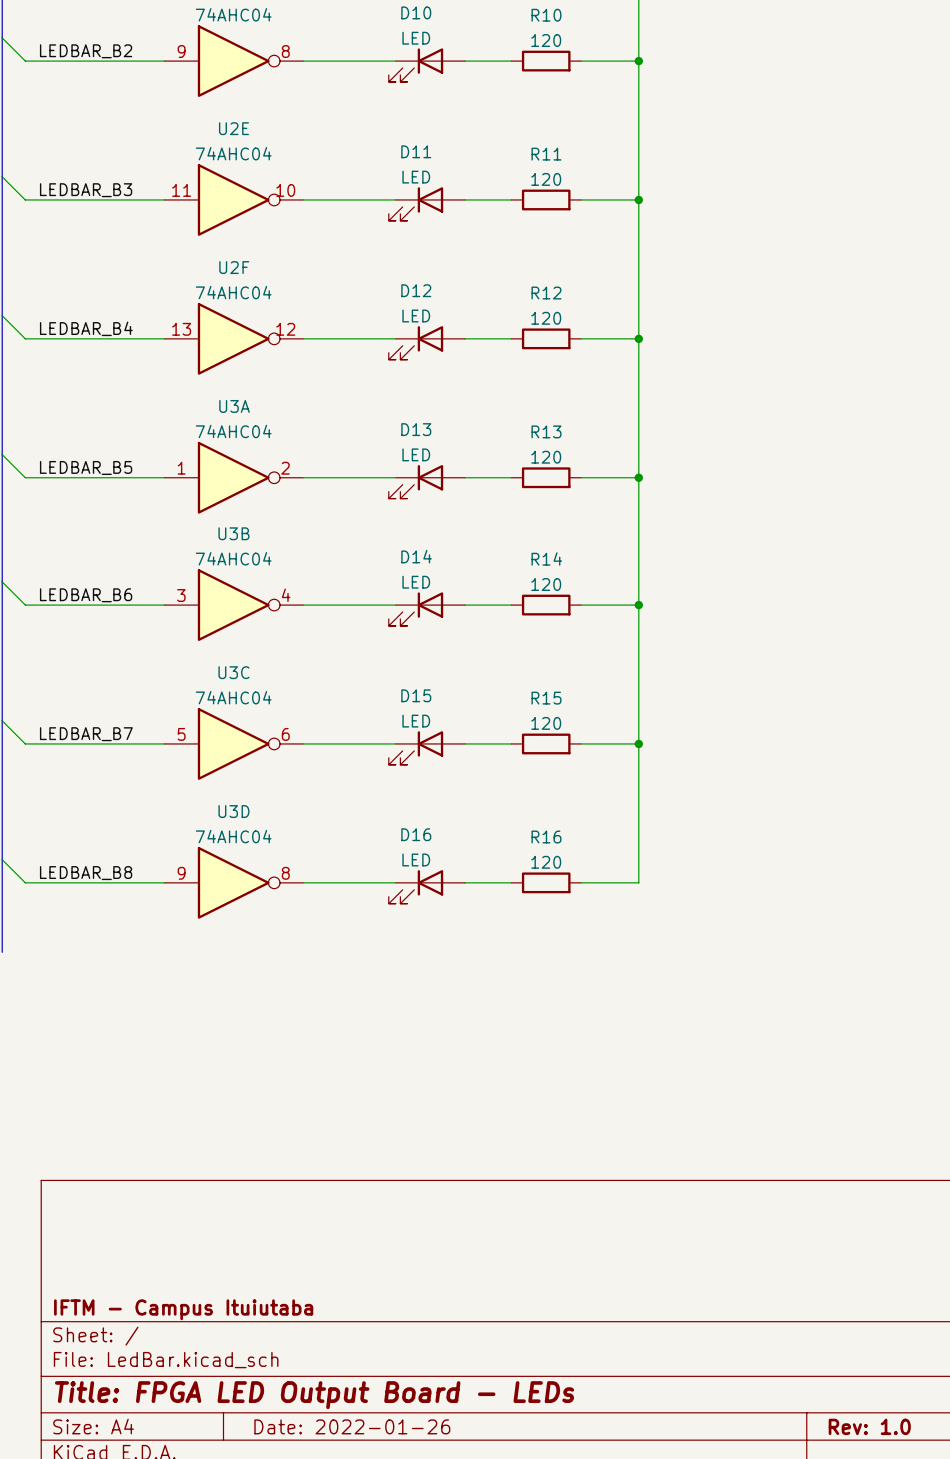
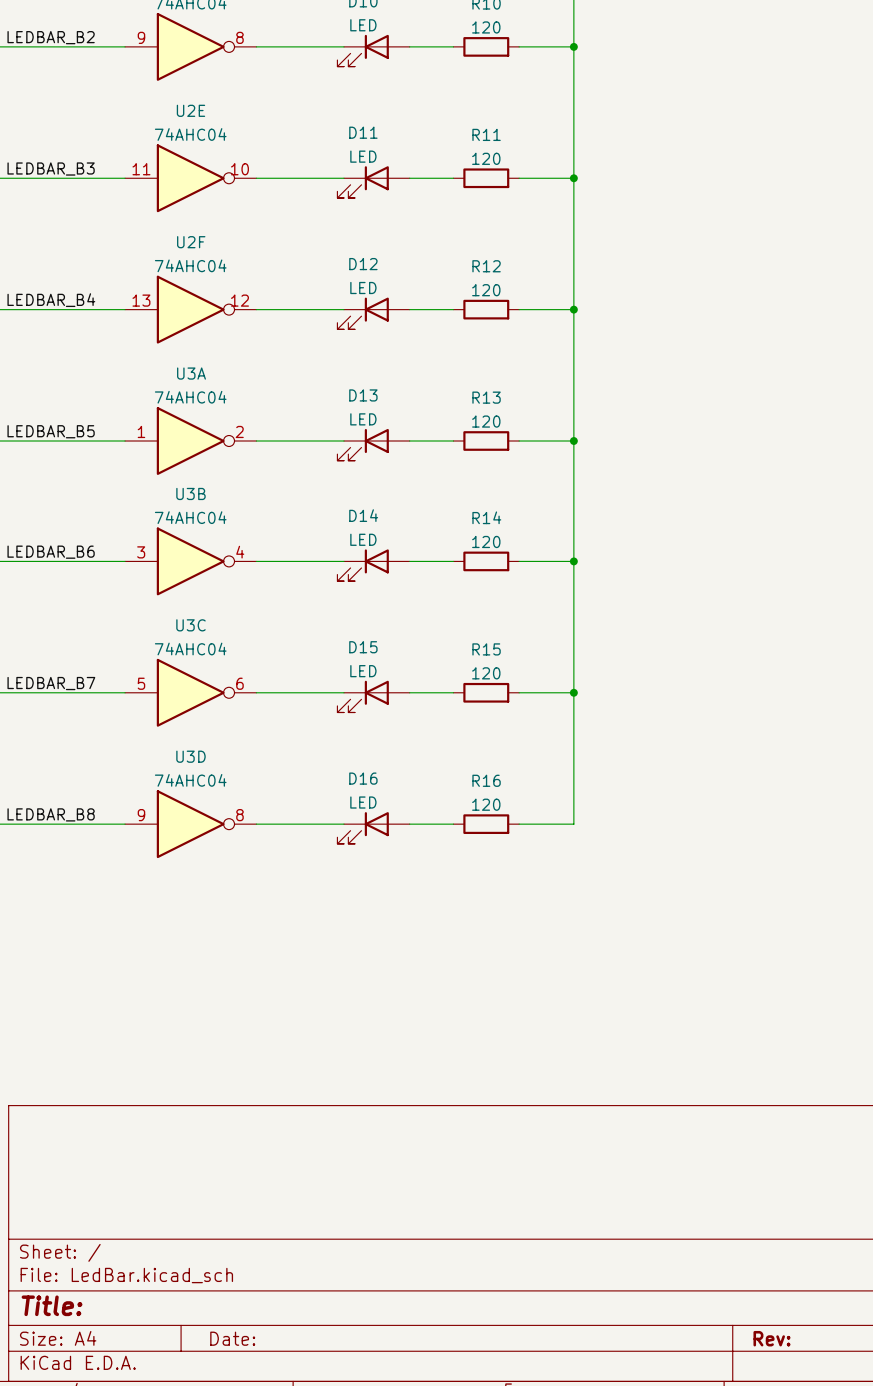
title block: IFTM - Campus Ituiutaba (183, 1309) -> none
title block: Title: FPGA LED Output Board - LEDs (314, 1395) -> Title: (52, 1305)
title block: Date: 2022-01-26 (352, 1426) -> Date: (232, 1338)
title block: Rev: 1.0 (869, 1426) -> Rev: (771, 1338)

